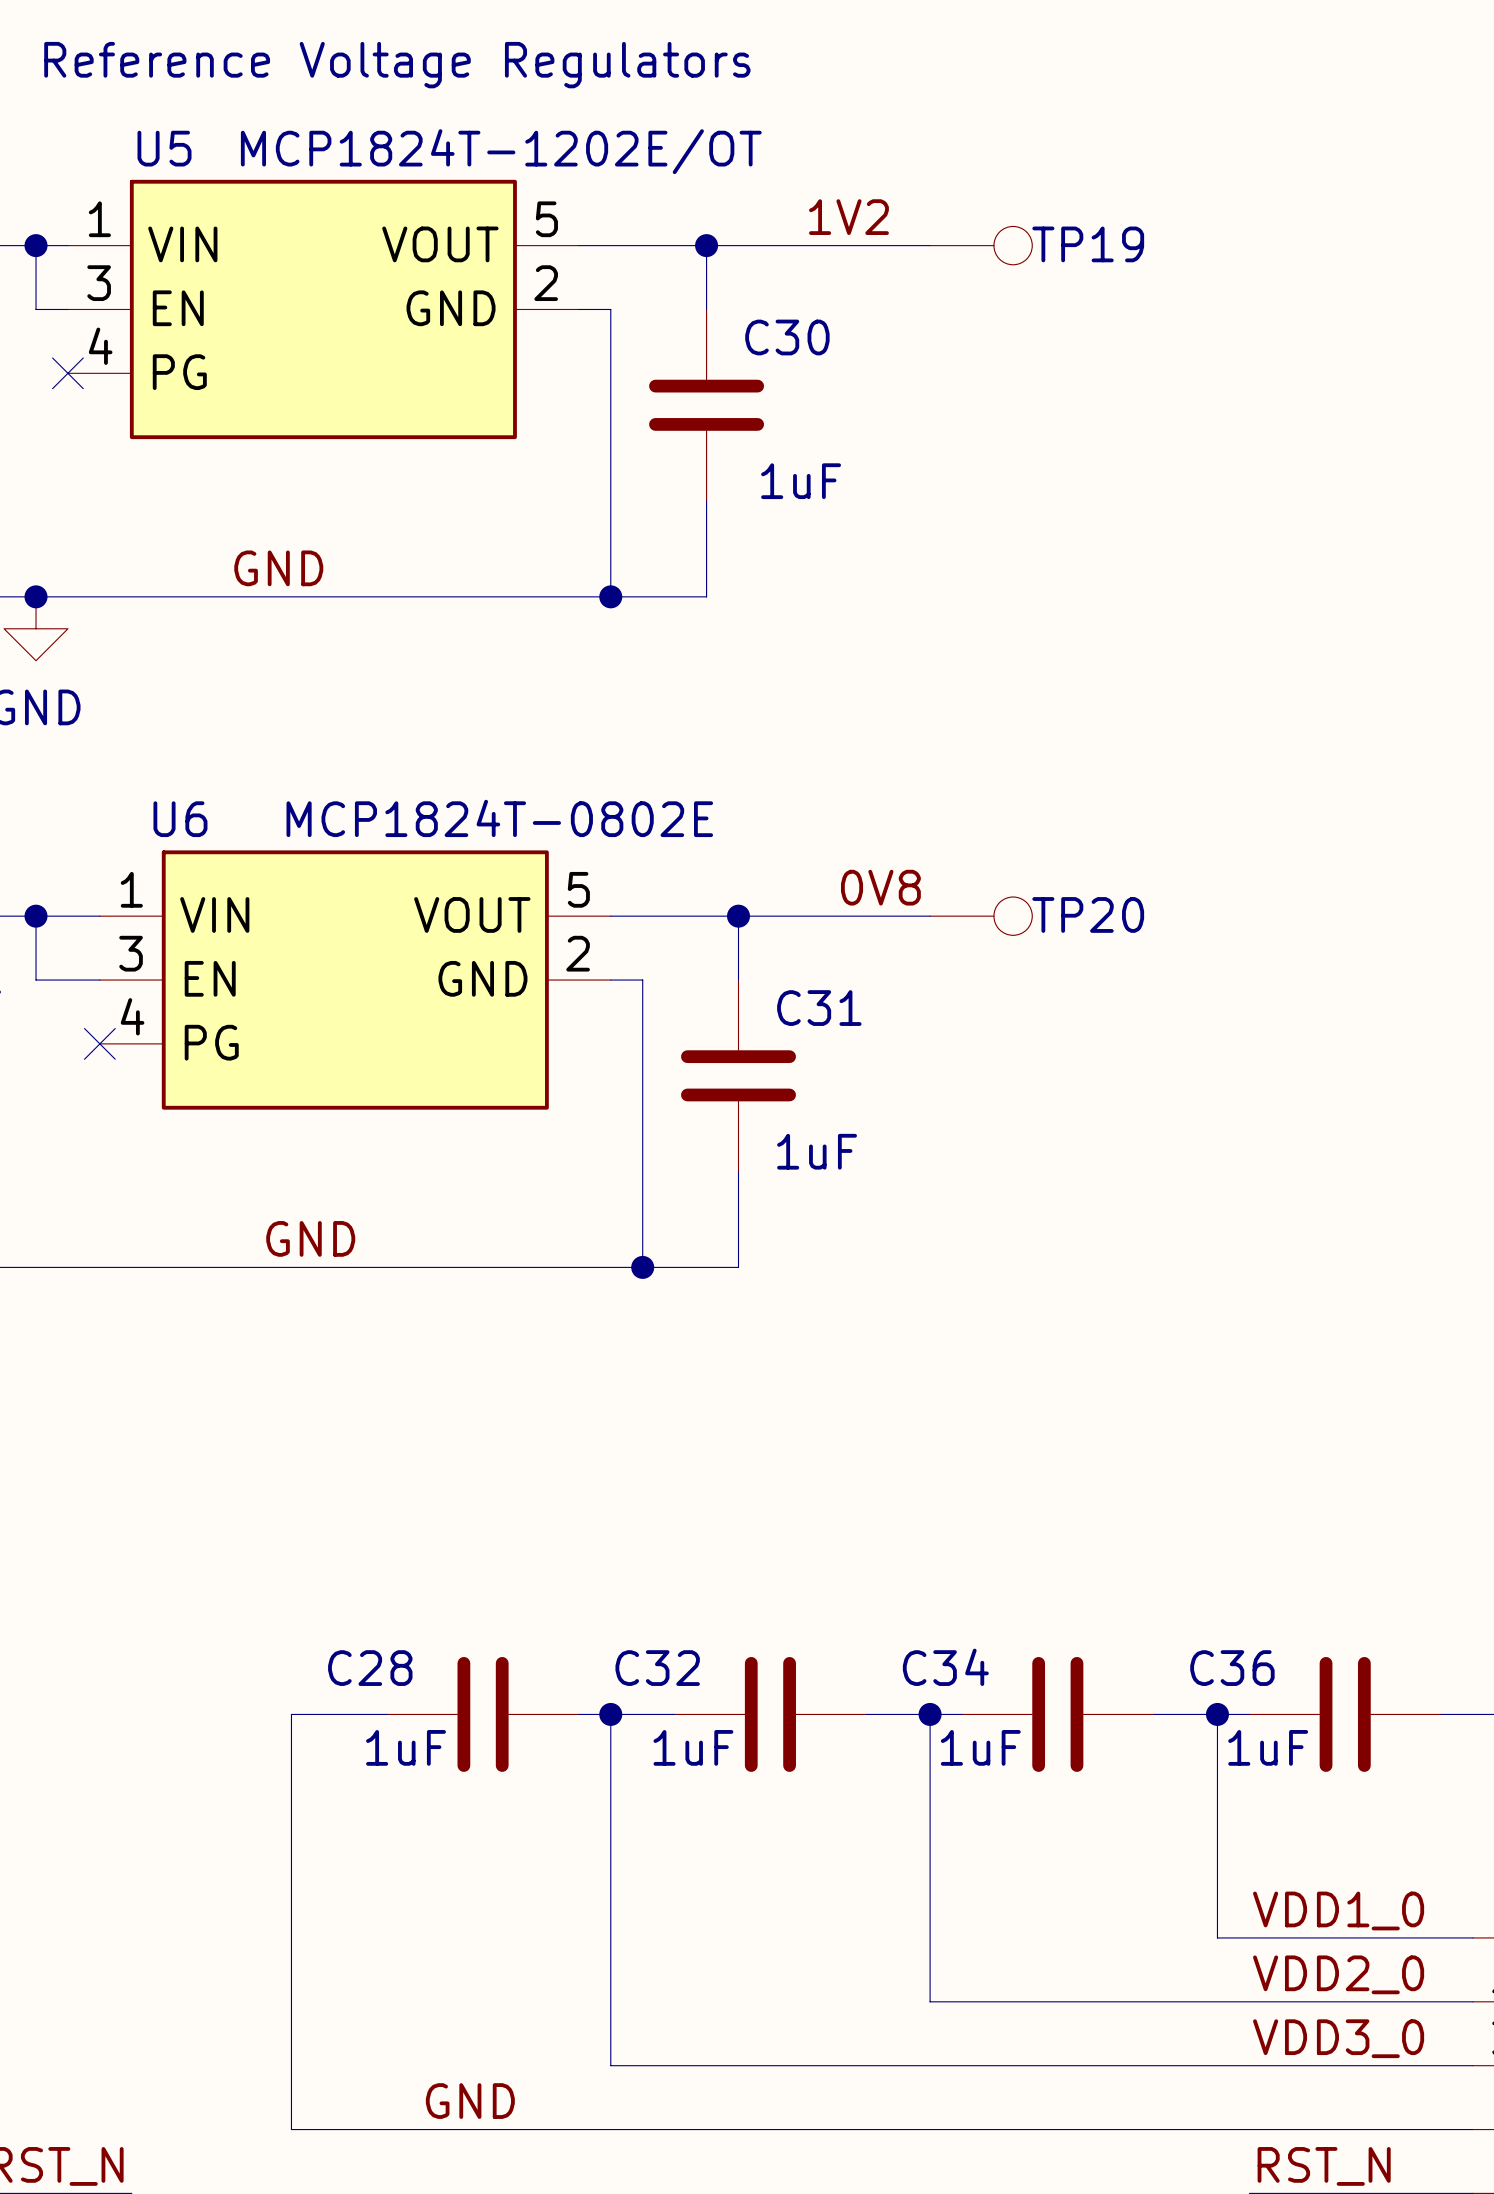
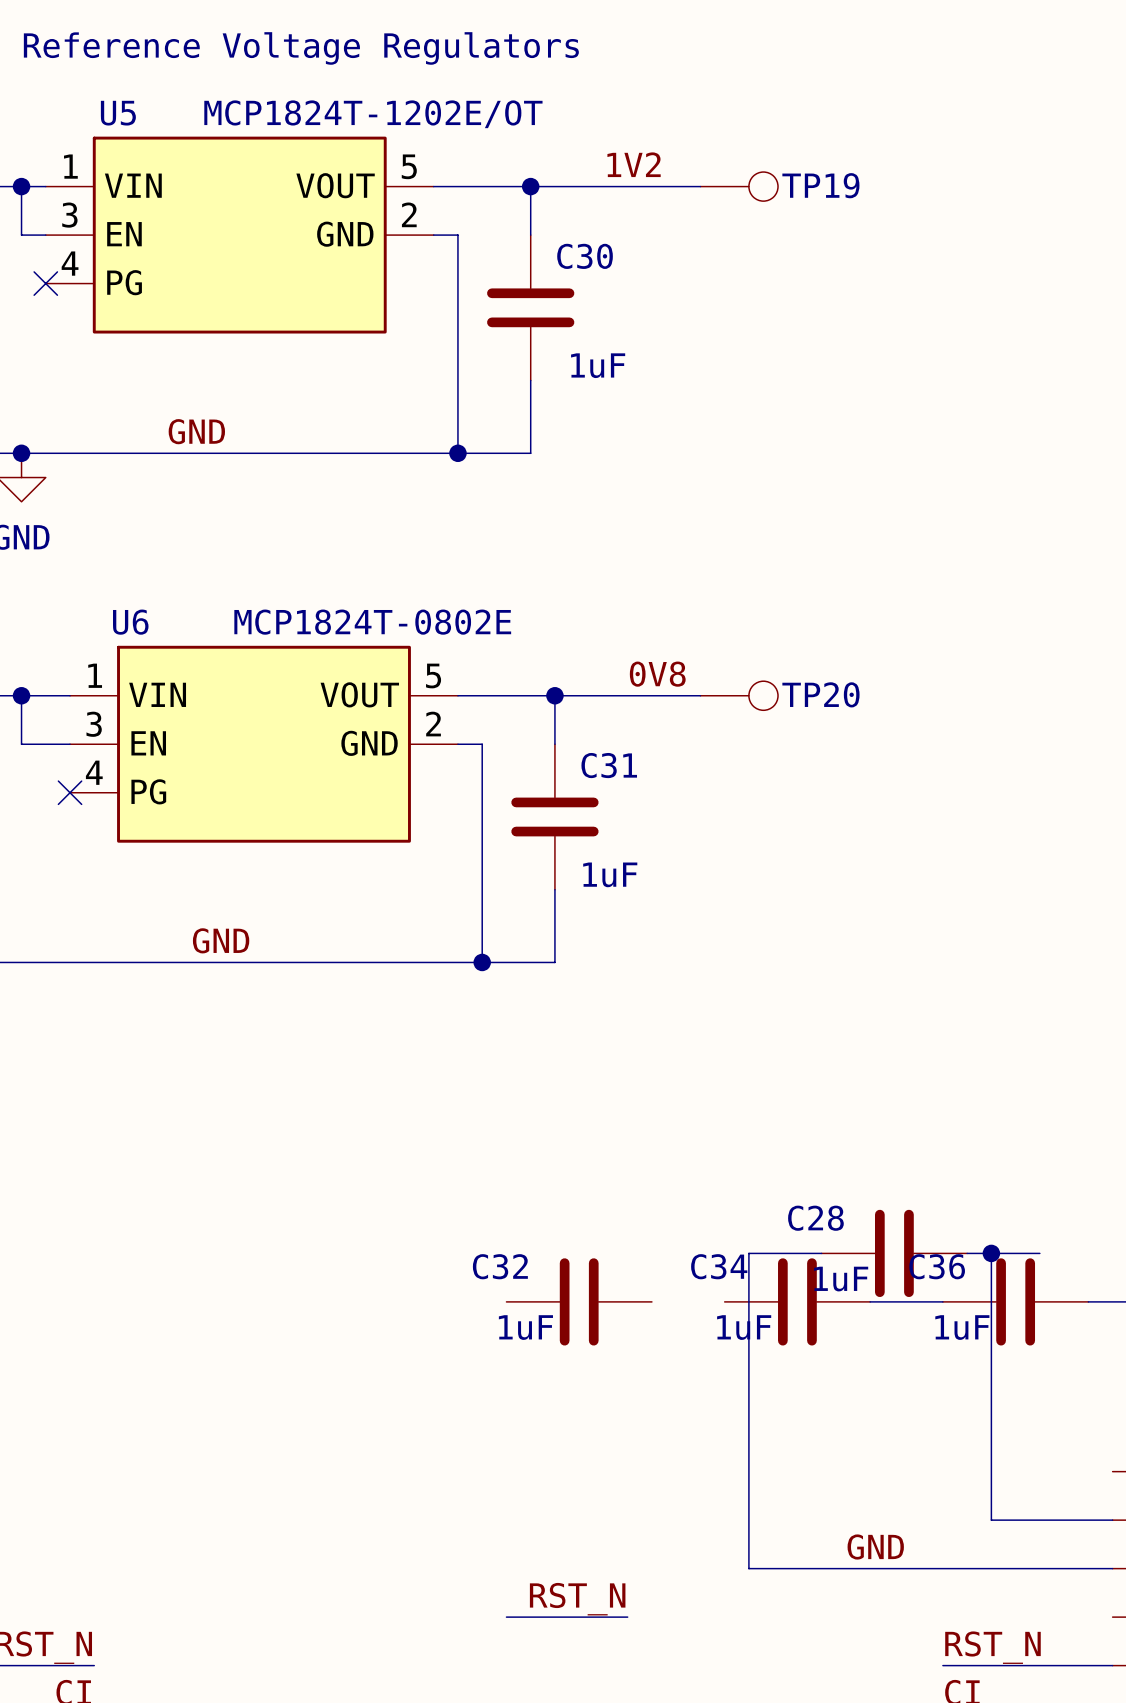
wire: (387, 1714) (291, 1714) (291, 2129) (674, 2129) -> none
C28 position: (483, 1714) -> (894, 1253)
wire: (578, 1714) (674, 1714) -> none
wire: (610, 1714) (610, 2065) (993, 2065) -> (821, 1253) (748, 1253) (748, 1568)
junction: (610, 1714) -> none
wire: (866, 1714) (962, 1714) -> (967, 1253) (1039, 1253)
wire: (930, 1714) (930, 2001) (1313, 2001) -> (991, 1253) (991, 1520)
junction: (930, 1714) -> none
wire: (1217, 1714) (1217, 1937) (1472, 1937) -> none
junction position: (1217, 1714) -> (991, 1253)
label: VDD1_0 (1338, 1910) -> none
label: VDD2_0 (1338, 1974) -> none
label: none -> GND (875, 1547)
label: VDD3_0 (1338, 2038) -> none
label: GND (470, 2101) -> none
label: none -> RST_N (577, 1599)
wire: (834, 2129) (1472, 2129) -> none

